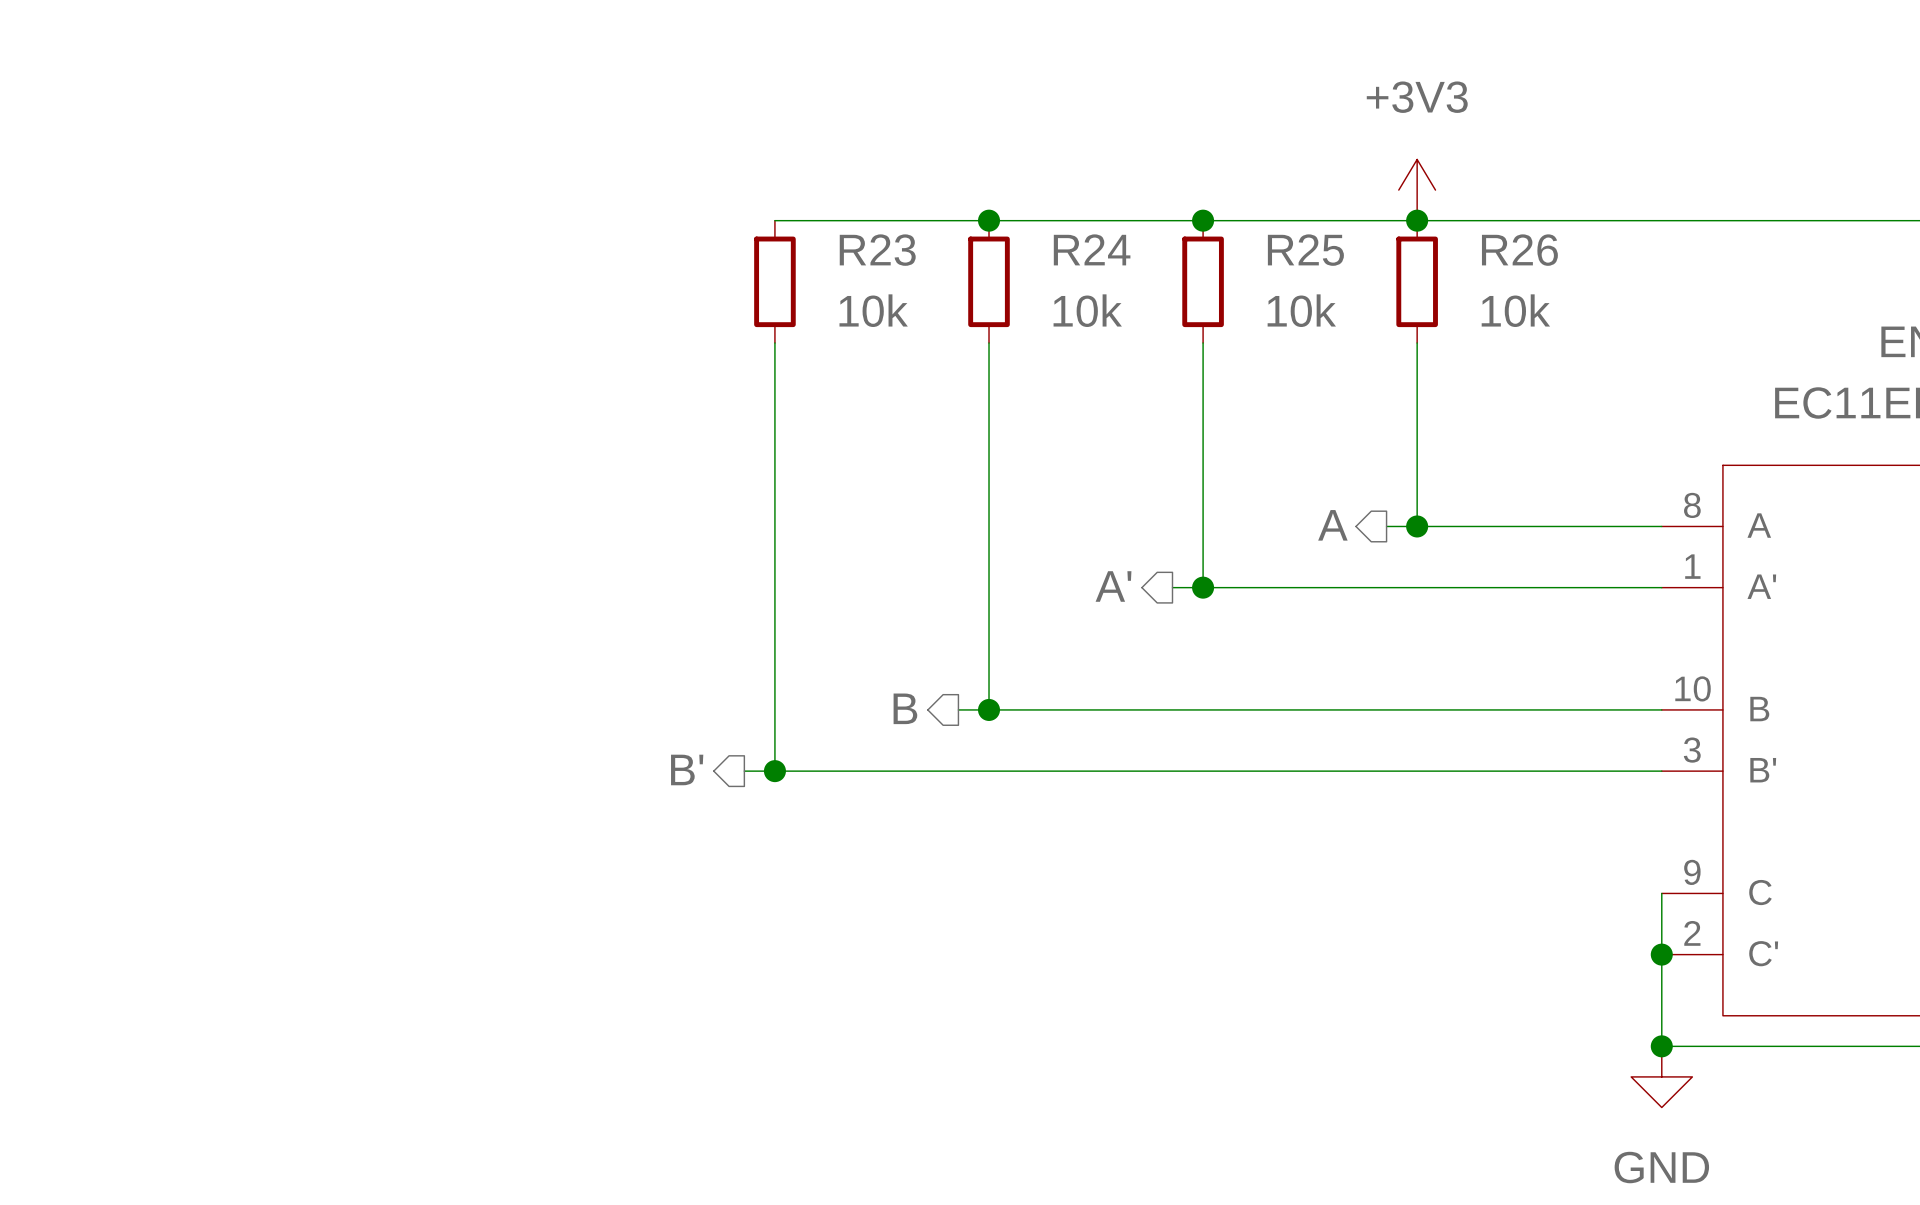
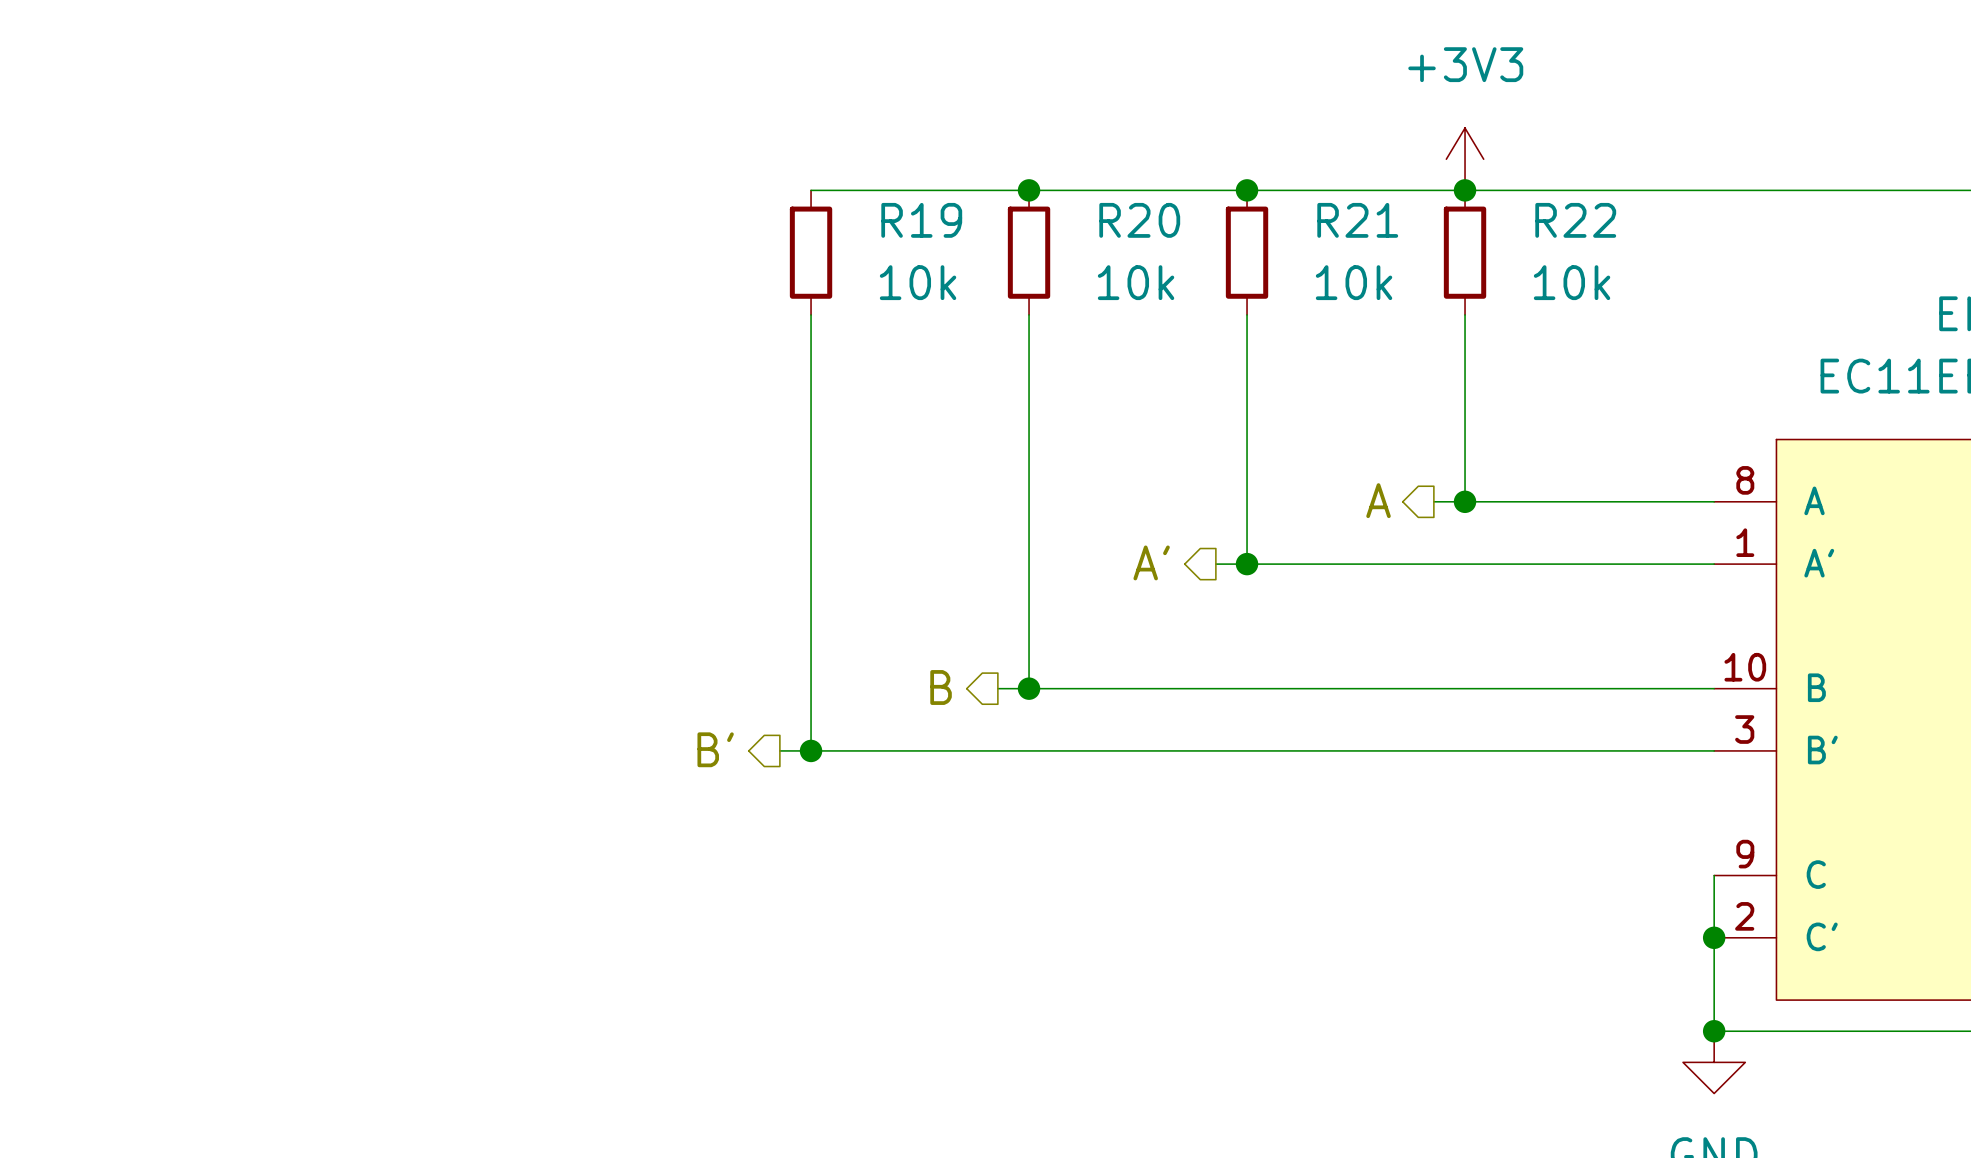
R24 name: R24 (1092, 249) -> R20 (1139, 220)
R23 name: R23 (877, 250) -> R19 (921, 220)
R25 name: R25 (1305, 250) -> R21 (1357, 220)
R26 name: R26 (1519, 250) -> R22 (1575, 220)

